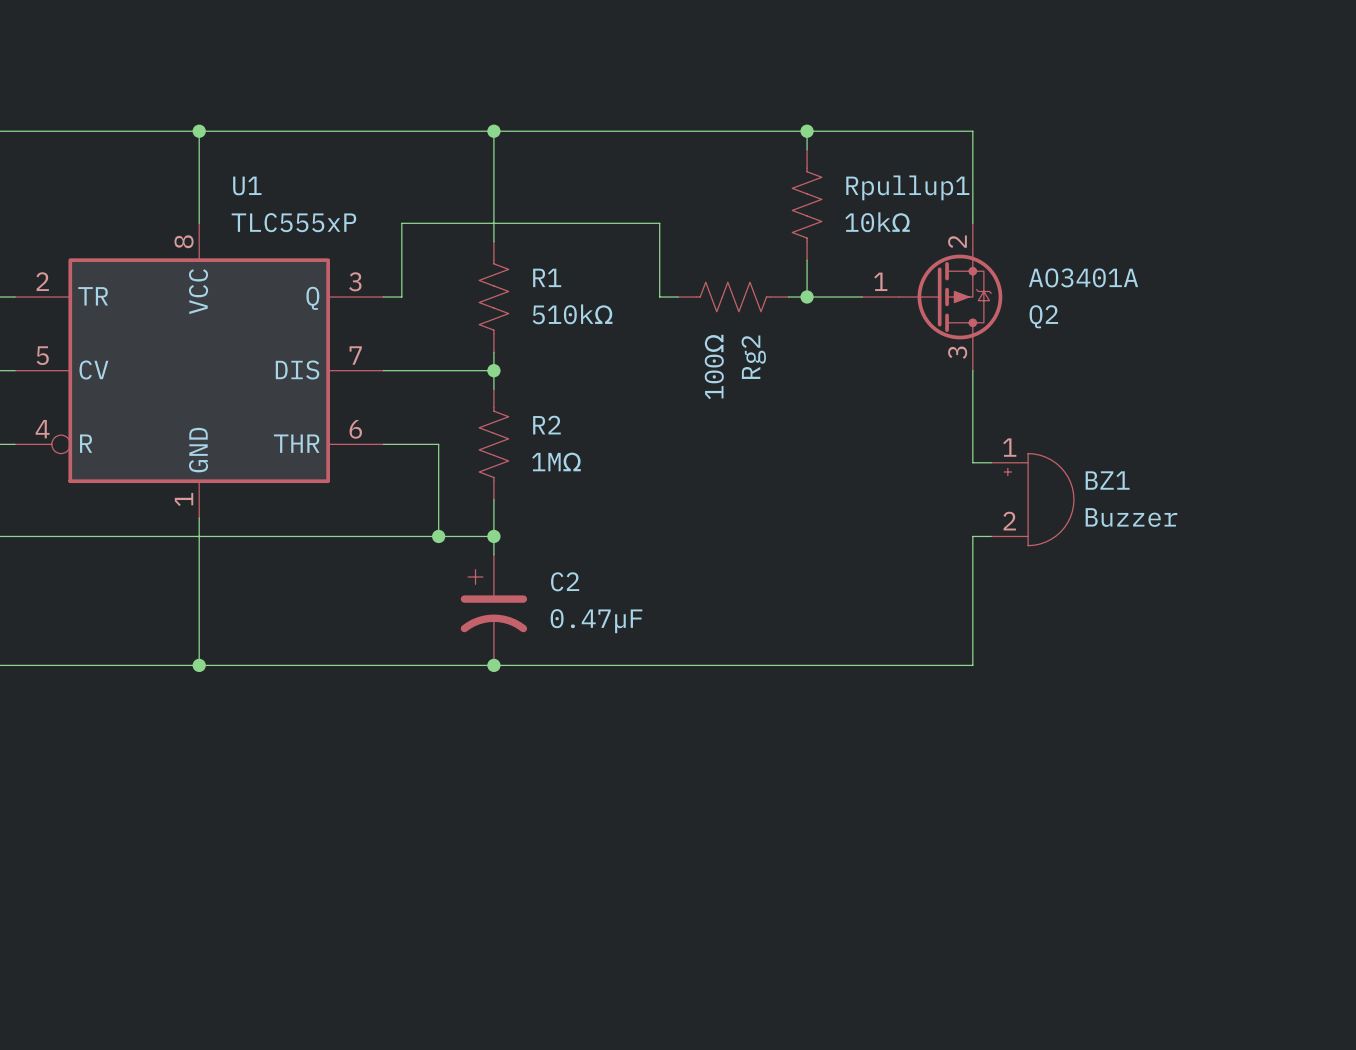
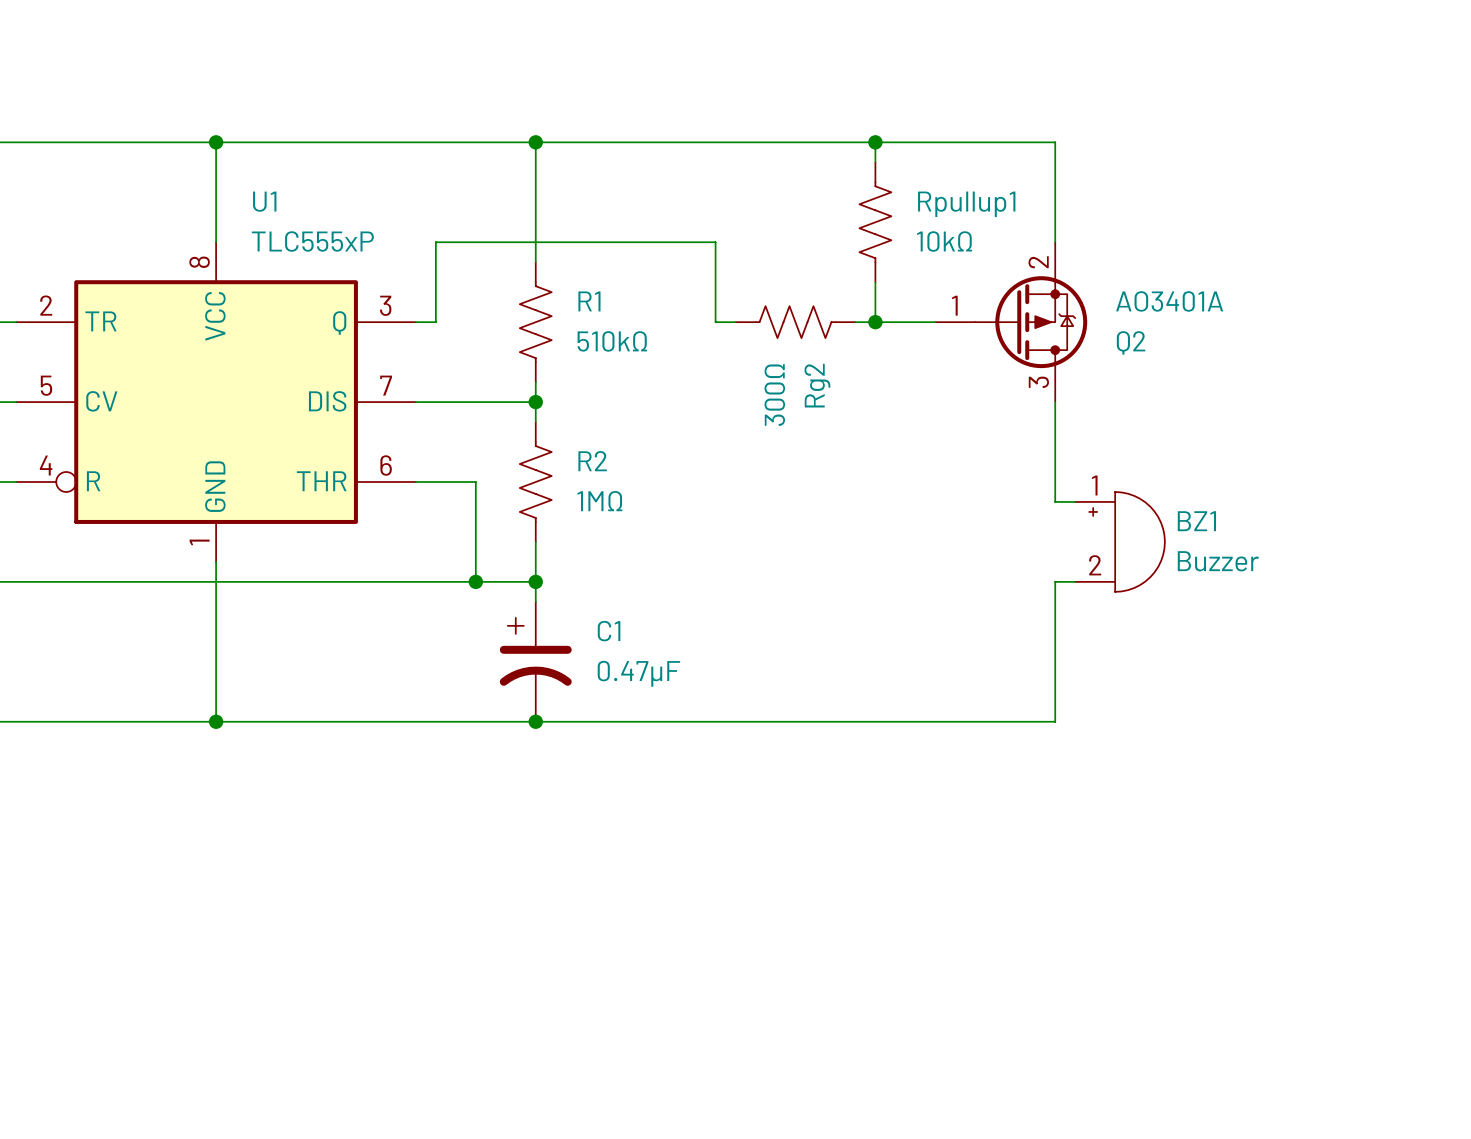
Rg2 value: 100Ω (714, 367) -> 300Ω (774, 395)
C2 name: C2 (565, 581) -> C1 (609, 631)

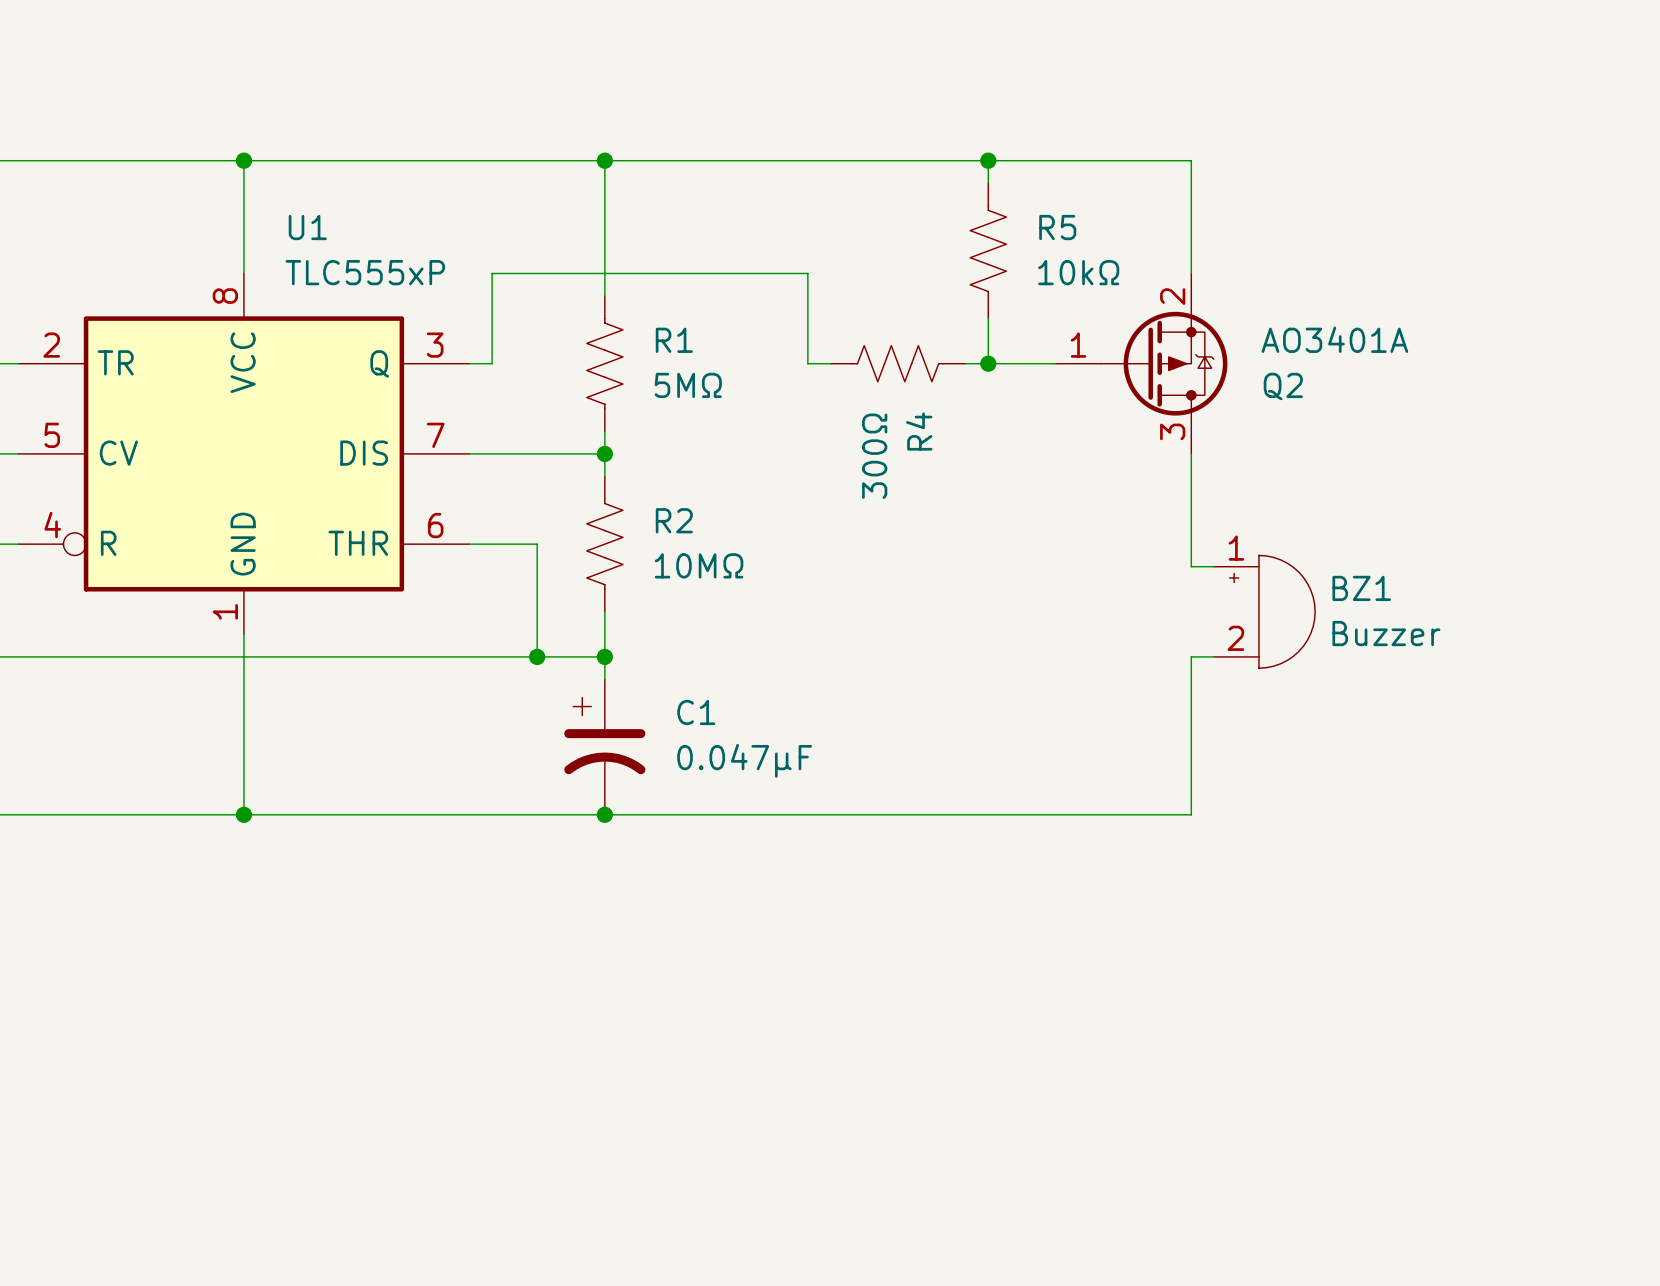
Rpullup1 name: Rpullup1 (966, 204) -> R5 (1057, 227)
R1 value: 510kΩ (612, 341) -> 5MΩ (688, 385)
Rg2 name: Rg2 (817, 385) -> R4 (919, 431)
R2 value: 1MΩ (599, 501) -> 10MΩ (699, 565)
C1 value: 0.47µF (638, 673) -> 0.047µF (744, 760)

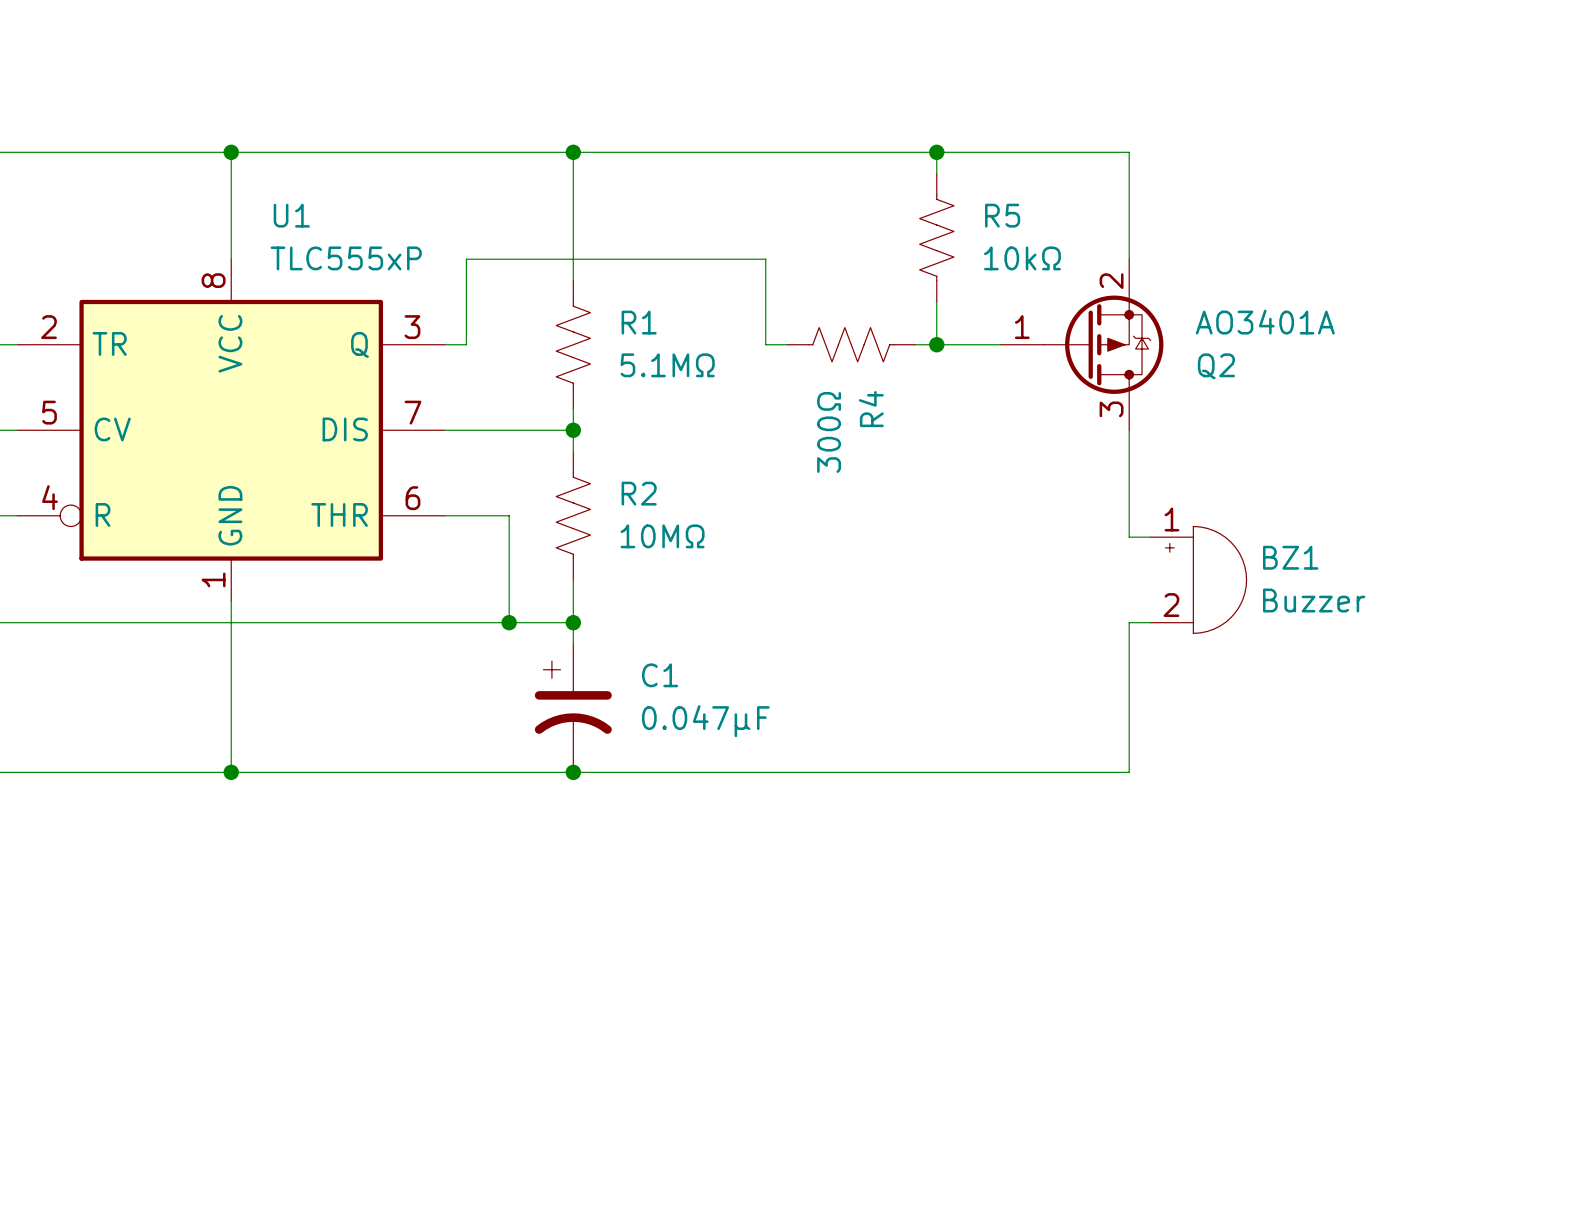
R1 value: 5MΩ (688, 385) -> 5.1MΩ (667, 365)

